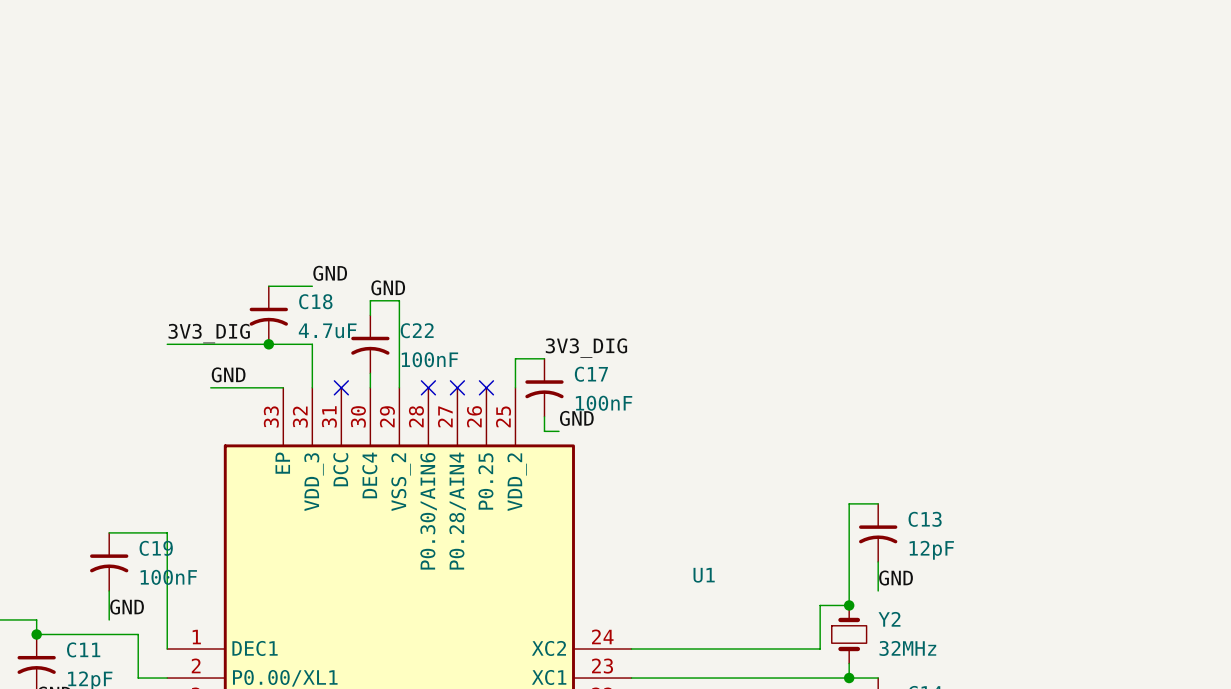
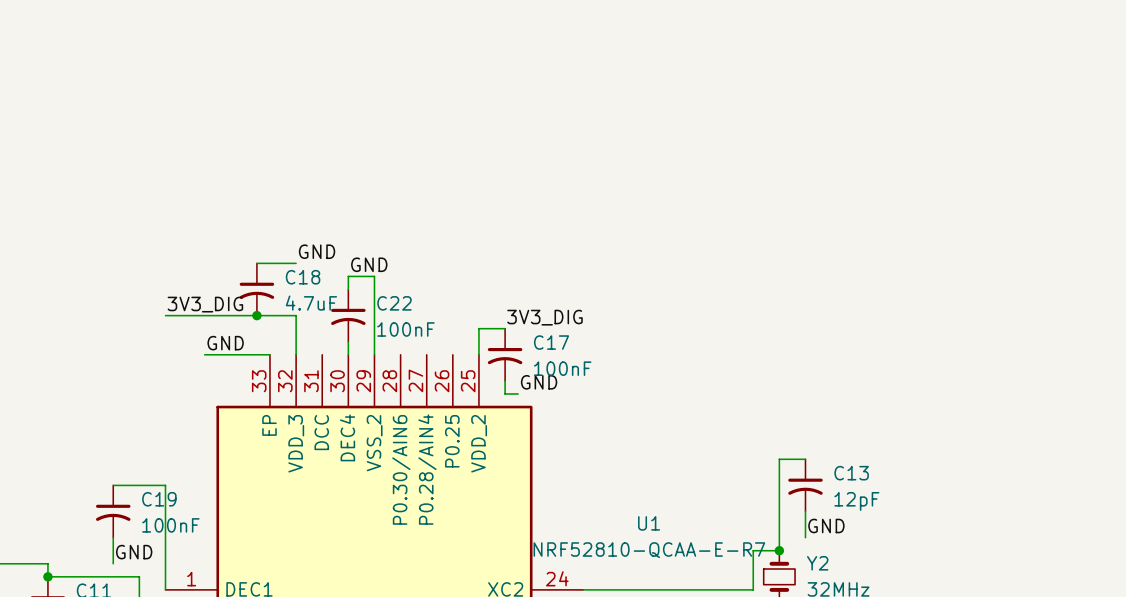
no-connect mark: (341, 387) -> none
no-connect mark: (428, 387) -> none
no-connect mark: (457, 387) -> none
no-connect mark: (486, 387) -> none
U1 value: none -> NRF52810-QCAA-E-R7 (649, 550)

